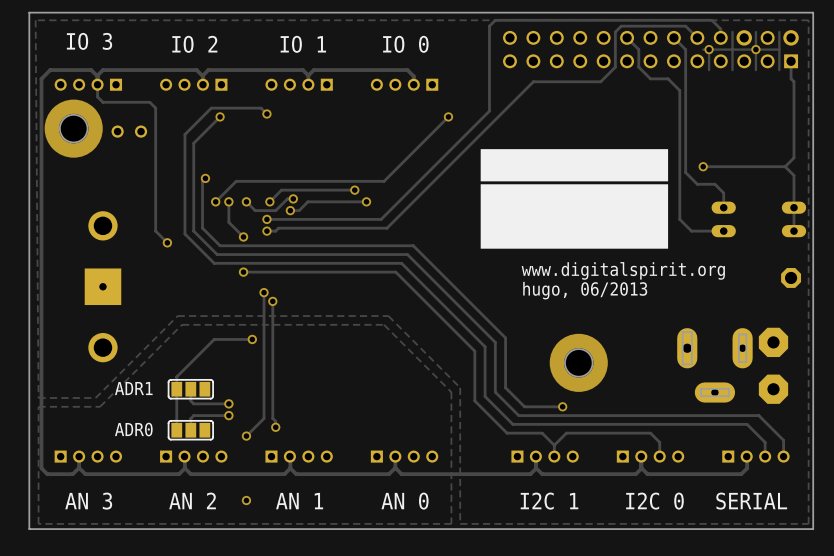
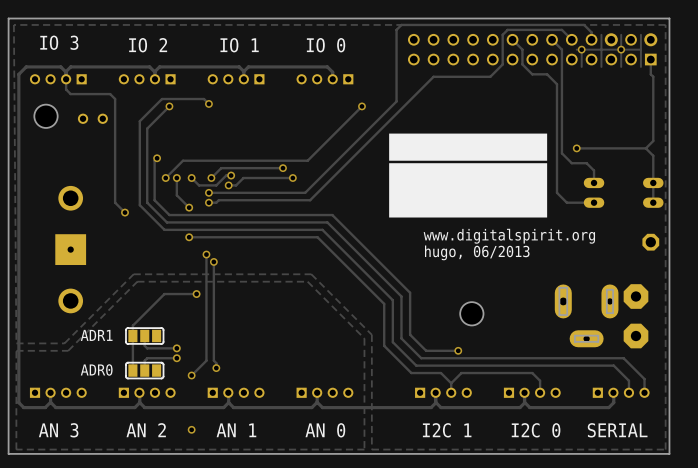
via: (73, 128) -> none
via: (578, 362) -> none

